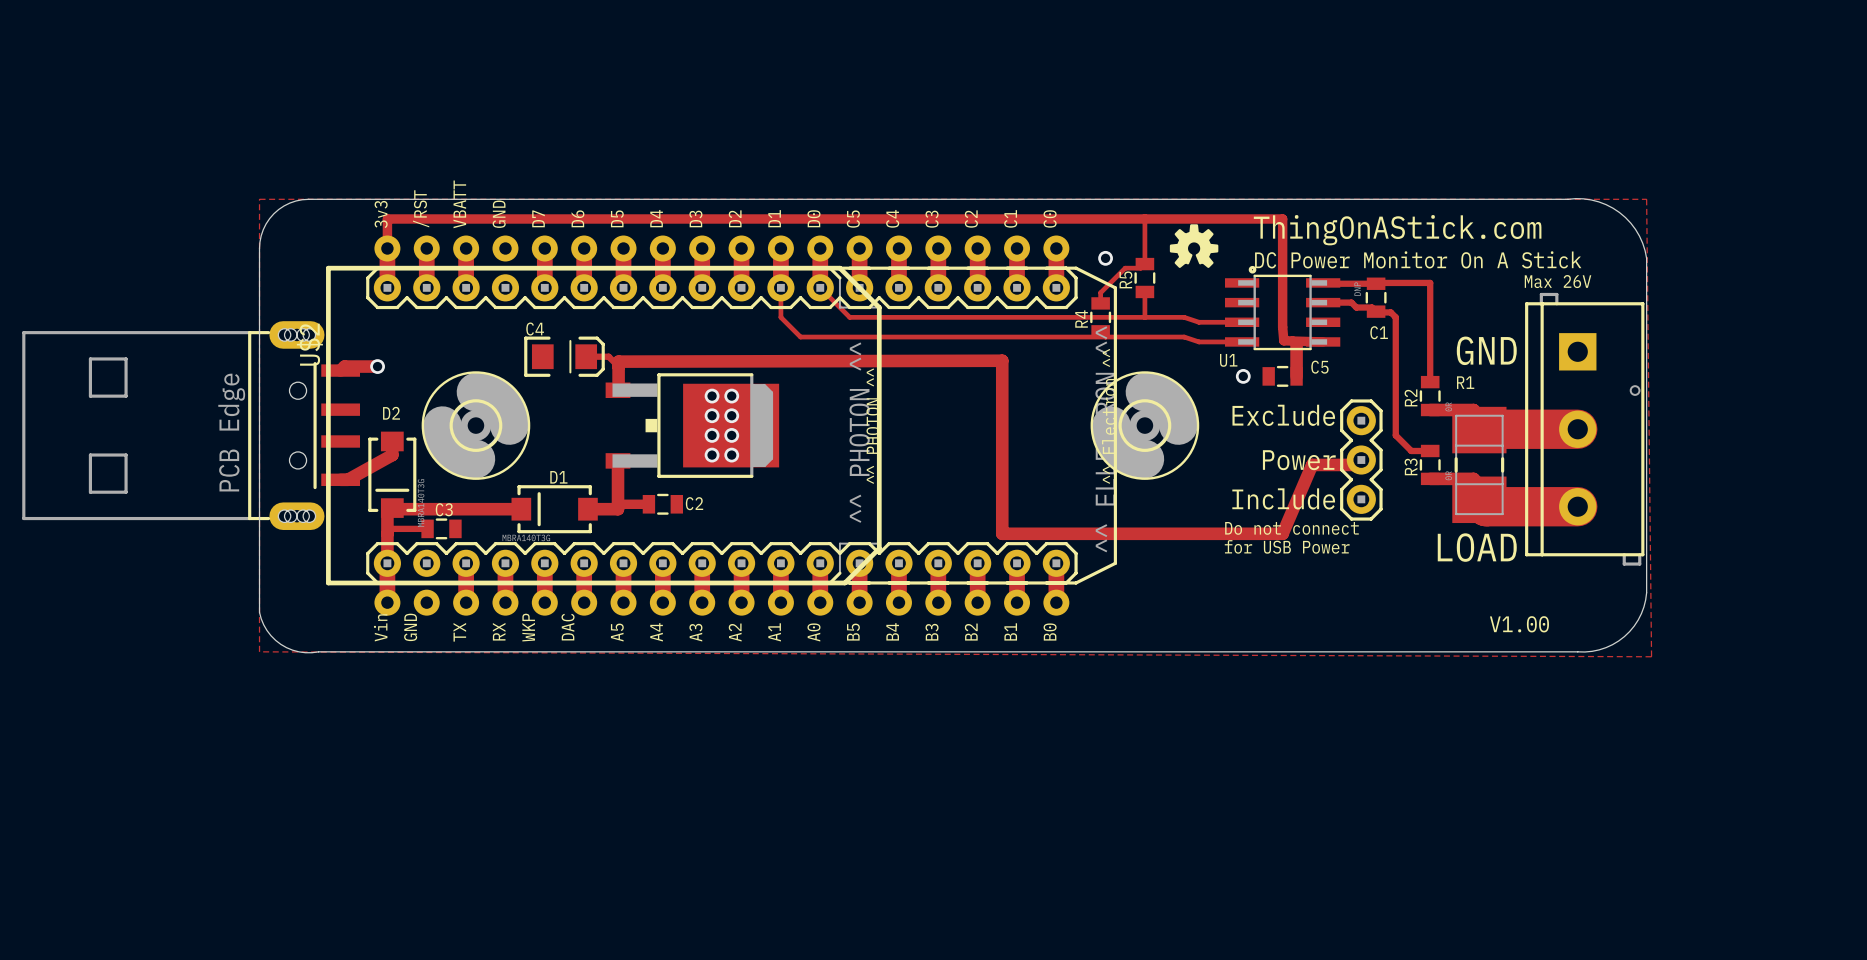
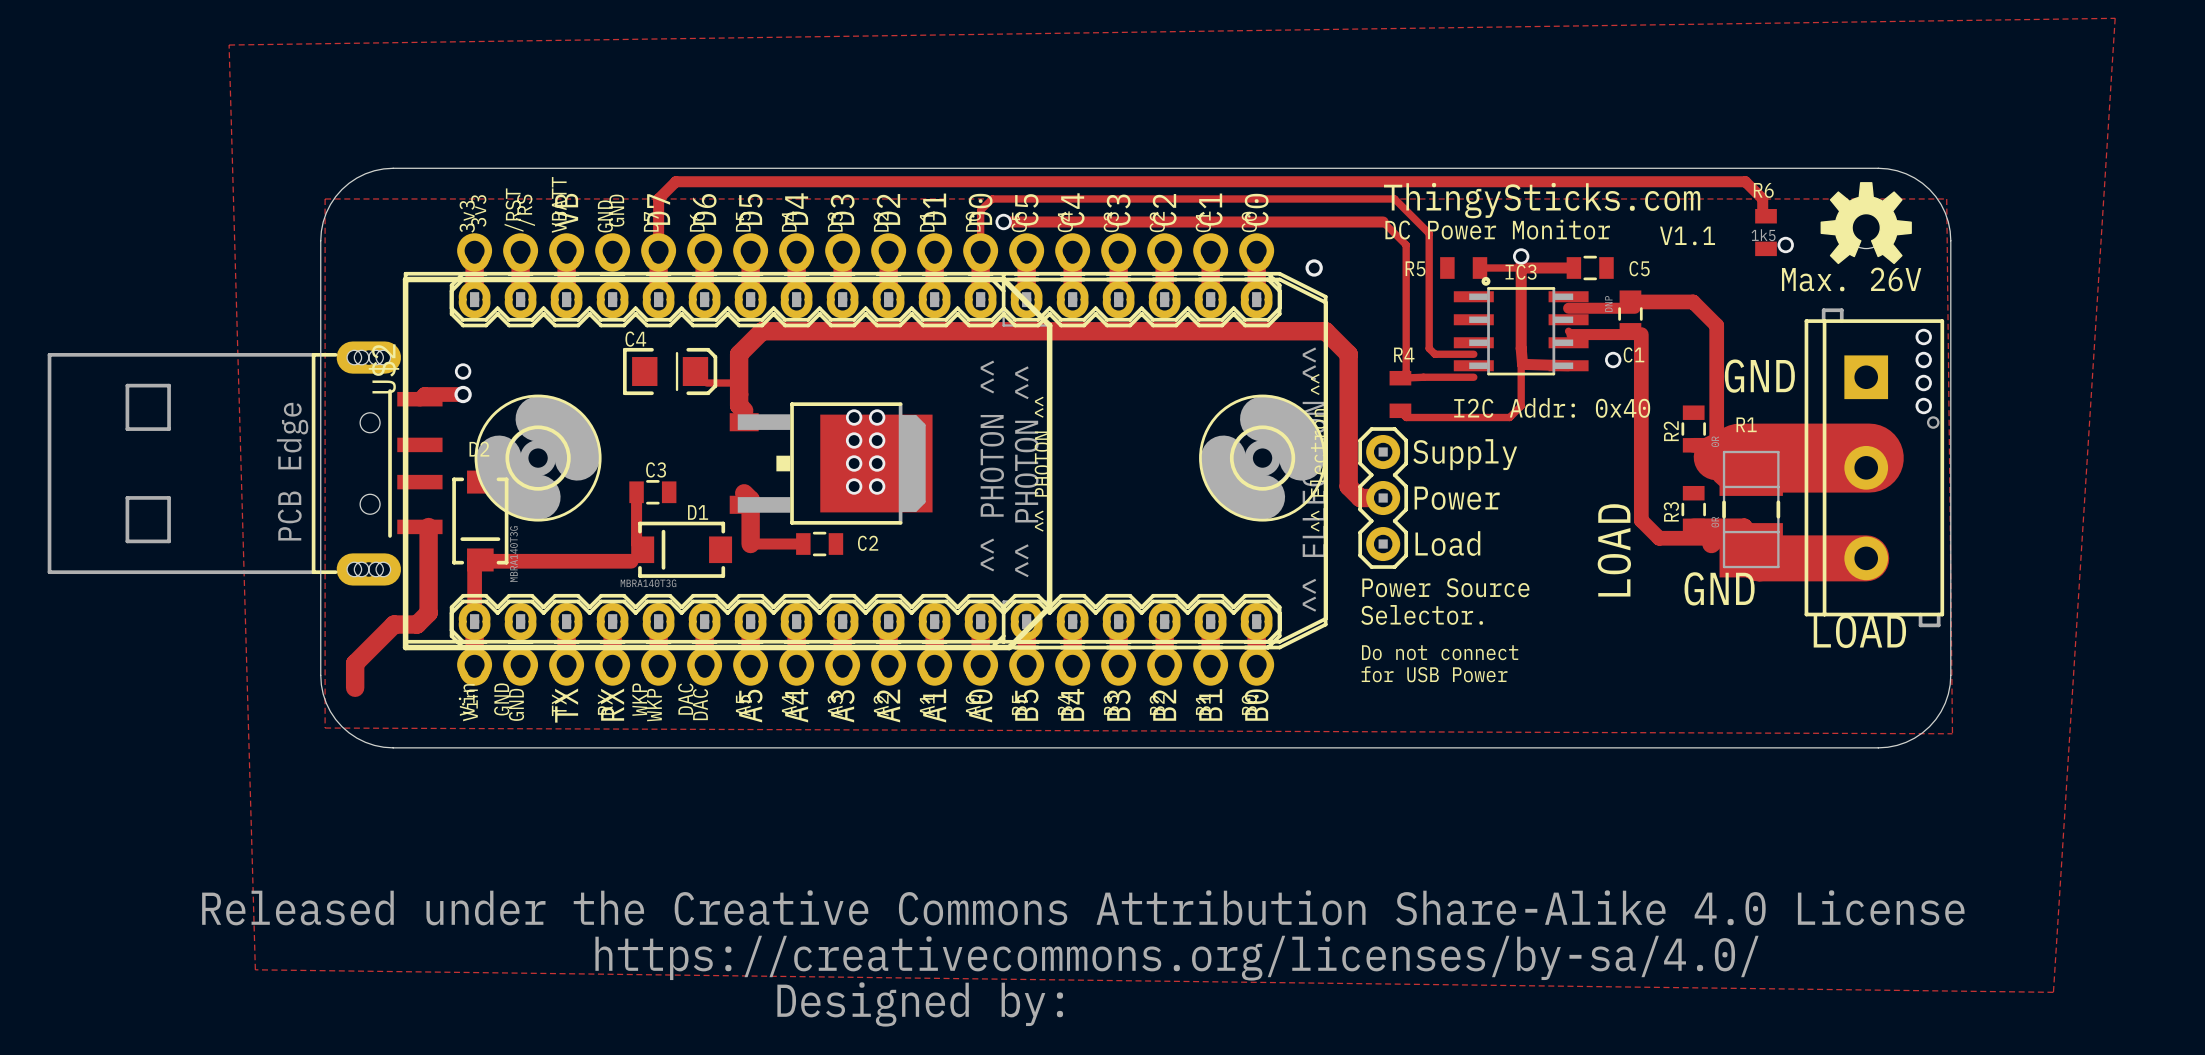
zone outline: none -> (2115, 18) (229, 45) (255, 969) (2053, 992) (2115, 18)
drawing: none -> [1820, 182, 1912, 265]
board edge: (308, 199) (1575, 198) (1598, 201) (1613, 208) (1630, 223) (1642, 243) (1646, 258) (1646, 592) (1643, 606) (1638, 620) (1624, 636) (1606, 647) (1584, 651) (305, 652) (292, 650) (280, 644) (271, 635) (263, 624) (259, 612) (259, 248) (263, 229) (273, 213) (289, 203) (308, 199) -> (393, 168) (365, 173) (341, 189) (326, 213) (320, 240) (321, 684) (326, 703) (335, 719) (349, 732) (365, 742) (393, 747) (1878, 747) (1897, 745) (1914, 738) (1935, 719) (1945, 703) (1950, 675) (1950, 231) (1945, 213) (1935, 196) (1922, 183) (1906, 173) (1878, 168) (393, 168)
track: none -> (1766, 216) (1762, 212) (1762, 198) (1745, 181) (675, 181) (658, 198) (658, 256)
track: (839, 218) (387, 218) (387, 243) -> none
via: none -> (1003, 221)
track: (1144, 218) (1144, 264) (1140, 268) (1125, 268) (1100, 292) (1100, 303) -> none
track: (1164, 218) (1282, 218) (1282, 248) -> (1383, 221) (1406, 244) (1406, 372) (1400, 378) (1473, 377)
drawing: [1169, 224, 1219, 268] -> none
text: none -> DC Power Monitor (1497, 229)
R6: none -> 1k5 (1766, 232)
text: ThingOnAStick.com (1397, 230) -> ThingySticks.com (1542, 200)
text: none -> V1.1 (1687, 235)
via: none -> (1785, 244)
track: none -> (980, 256) (980, 210) (992, 198) (1394, 198) (1429, 233) (1429, 348) (1434, 354) (1473, 354)
via: none -> (1521, 256)
R5 footprint: [1134, 257, 1156, 299] -> [1440, 257, 1488, 279]
track: none -> (1479, 267) (1573, 267)
text: DC Power Monitor On A Stick (1418, 259) -> none
text: Max 26V (1558, 281) -> Max. 26V (1851, 279)
track: (780, 282) (780, 317) (800, 337) (1184, 337) (1199, 341) (1242, 341) -> none
track: (820, 282) (820, 287) (849, 317) (1184, 317) (1199, 322) (1242, 322) -> none
track: (1323, 282) (1430, 282) (1430, 382) -> none
track: (1144, 291) (1144, 317) -> none
track: none -> (1568, 308) (1635, 308) (1641, 301) (1693, 301) (1716, 325) (1716, 457)
R4 footprint: [1090, 297, 1112, 338] -> [1389, 370, 1412, 419]
track: (1323, 302) (1351, 302) (1356, 307) (1371, 307) (1376, 312) (1390, 312) (1395, 317) (1395, 435) (1411, 450) (1430, 450) -> none
track: none -> (1568, 331) (1571, 334) (1641, 334) (1641, 520) (1659, 538) (1716, 538) (1711, 544)
via: none -> (1923, 337)
R4 name position: R4 (1081, 319) -> R4 (1404, 354)
via: none -> (1613, 360)
via: none -> (1923, 360)
track: none -> (1521, 365) (1521, 406) (1509, 417) (1406, 417) (1400, 410)
track: (1292, 341) (1296, 344) (1296, 376) -> none
via: none -> (463, 371)
C4 position: (564, 356) -> (670, 371)
via: none -> (1923, 383)
U1 name: U1 (1228, 360) -> IC3 (1521, 272)
C5 name position: C5 (1319, 367) -> C5 (1639, 268)
via: (1243, 376) -> none
C5 position: (1282, 376) -> (1590, 267)
via: none -> (1923, 406)
text: none -> I2C Addr: 0x40 (1552, 407)
track: none -> (744, 410) (739, 405) (739, 354) (762, 331) (1325, 331) (1348, 354) (1348, 486) (1360, 498) (1383, 498)
R1 name position: R1 (1465, 382) -> R1 (1746, 424)
via: none -> (854, 417)
via: none -> (877, 417)
track: (618, 390) (618, 361) (1002, 360) (1002, 533) (1282, 533) (1312, 464) (1356, 464) (1361, 460) -> none
via: (712, 396) -> none
via: (731, 396) -> none
via: none -> (854, 440)
via: none -> (877, 440)
via: (712, 415) -> none
via: (731, 415) -> none
text: Exclude (1283, 415) -> none
text: none -> Supply (1465, 454)
part: none -> (538, 458)
part: none -> (865, 457)
part: none -> (1262, 458)
track: none -> (1716, 457) (1869, 458)
part: (475, 425) -> none
via: none -> (854, 463)
via: none -> (877, 463)
part: (1144, 425) -> none
track: (1577, 429) (1479, 430) -> none
via: (712, 435) -> none
via: (731, 435) -> none
track: (392, 441) (392, 455) (347, 479) (340, 479) -> none
via: none -> (854, 486)
via: none -> (877, 486)
track: none -> (636, 492) (636, 543) (642, 549)
track: none -> (744, 493) (750, 499) (750, 544) (803, 544)
via: (712, 455) -> none
via: (731, 455) -> none
track: (618, 460) (618, 509) (587, 509) -> none
text position: Power (1299, 460) -> Power (1457, 498)
part position: (1361, 460) -> (1383, 498)
D1 name position: D1 (558, 477) -> D1 (698, 512)
track: none -> (428, 527) (428, 613) (417, 624) (394, 624) (355, 663) (355, 687)
text: none -> Load (1447, 543)
text: Include (1283, 498) -> none
text: none -> LOAD (1614, 550)
C2 name position: C2 (694, 503) -> C2 (868, 543)
track: (618, 504) (648, 504) -> none
C2 position: (662, 504) -> (819, 544)
D1 position: (554, 509) -> (681, 549)
track: (427, 528) (392, 528) (387, 533) -> none
C3 position: (441, 528) -> (652, 492)
text position: Do not connect (1291, 528) -> Do not connect (1440, 652)
text: none -> Power Source (1445, 587)
text: none -> GND (1719, 588)
text position: for USB Power (1287, 546) -> for USB Power (1434, 674)
text position: LOAD (1477, 547) -> LOAD (1859, 631)
text: none -> Selector. (1422, 614)
text: V1.00 (1519, 624) -> none
drawing: none -> [202, 890, 1965, 1027]

